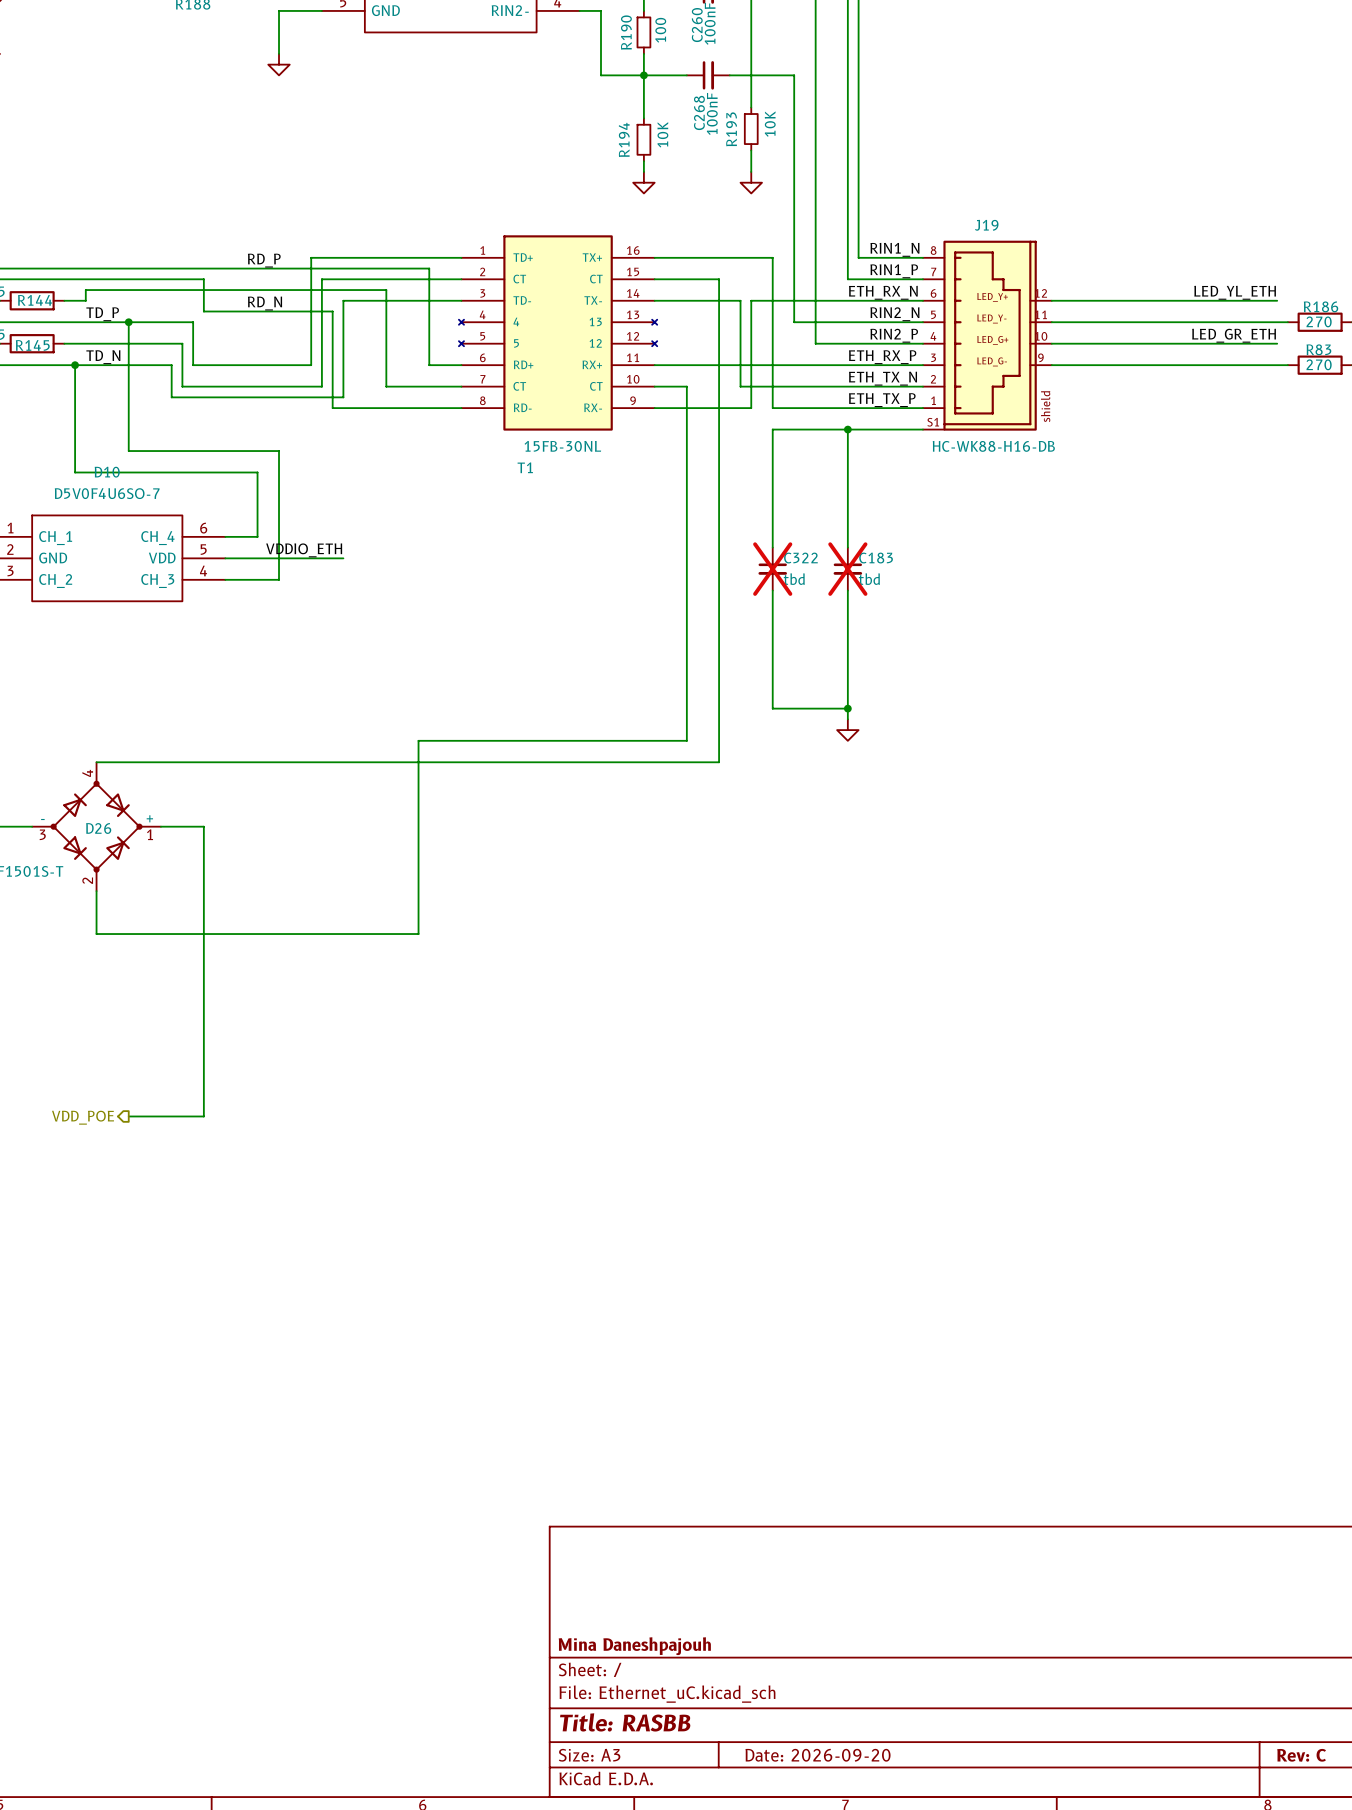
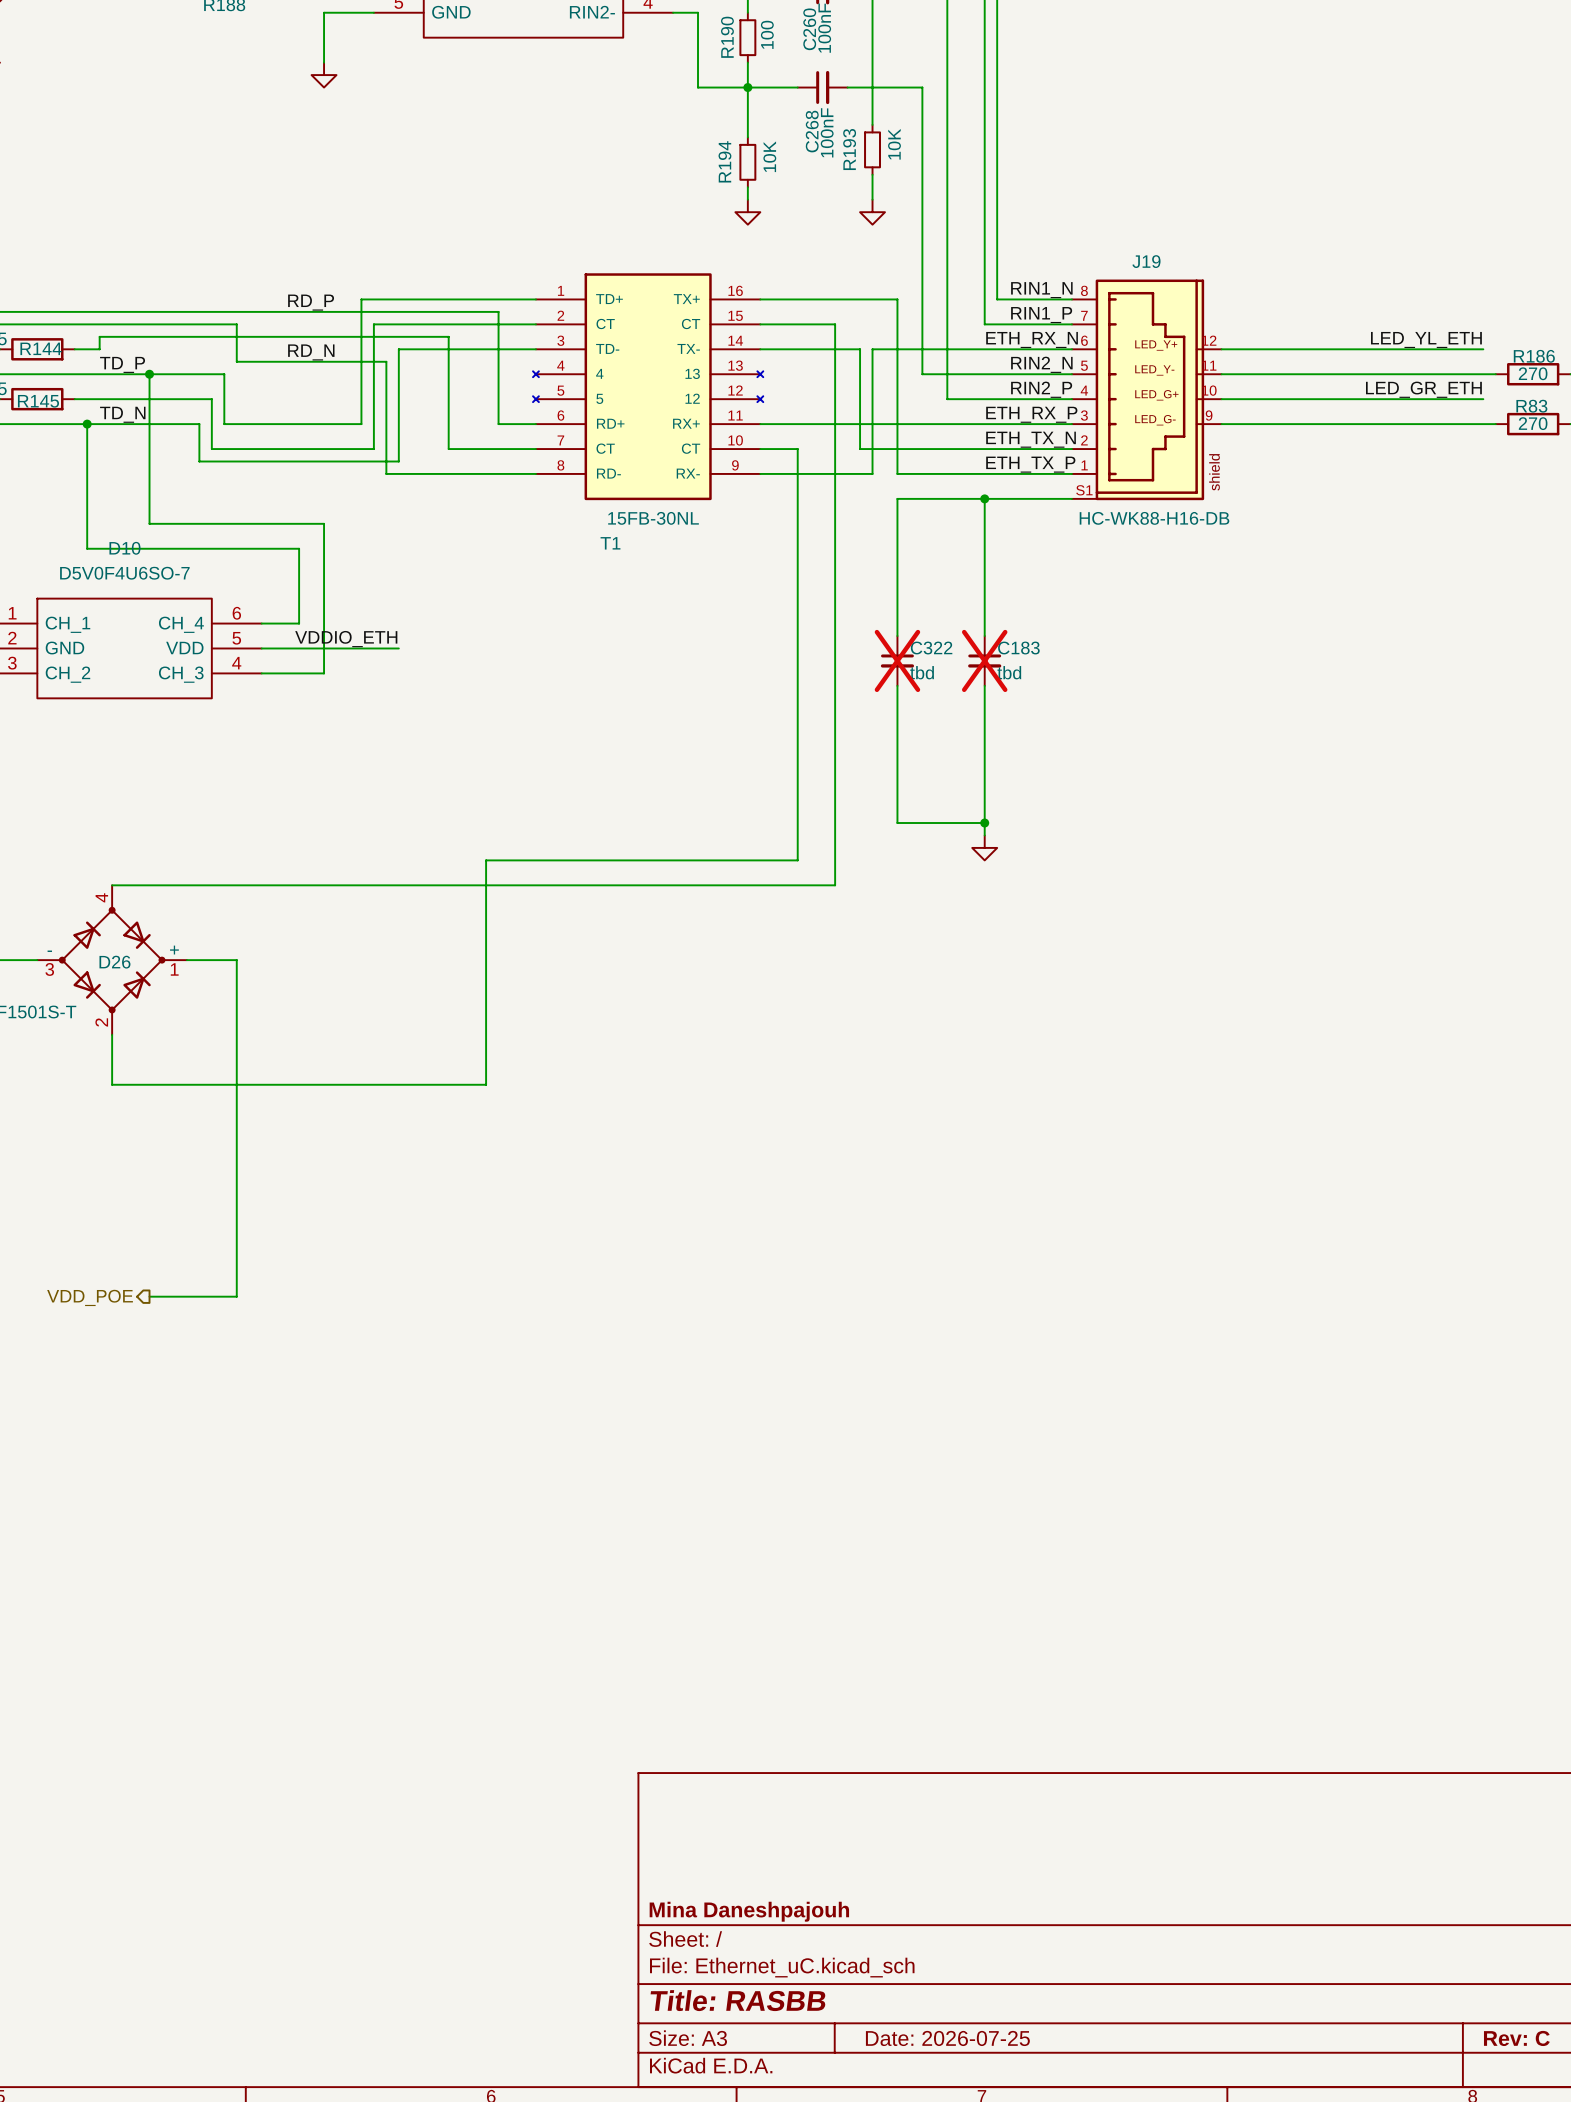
title block: Date: 2026-09-20 (818, 1755) -> Date: 2026-07-25 (947, 2038)

